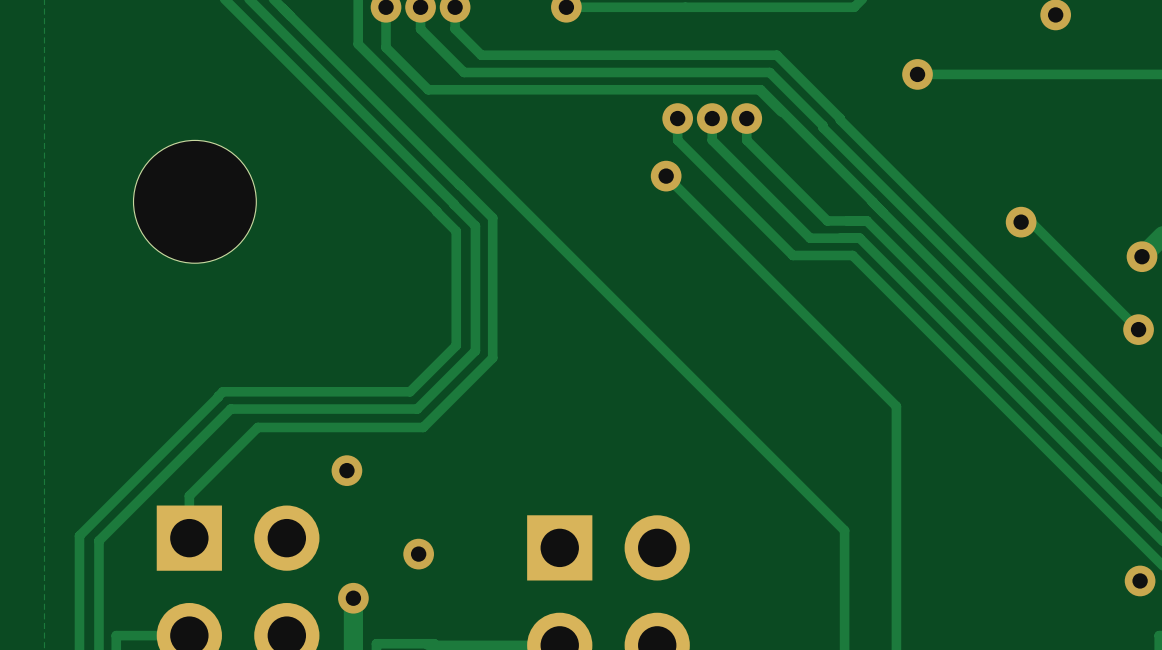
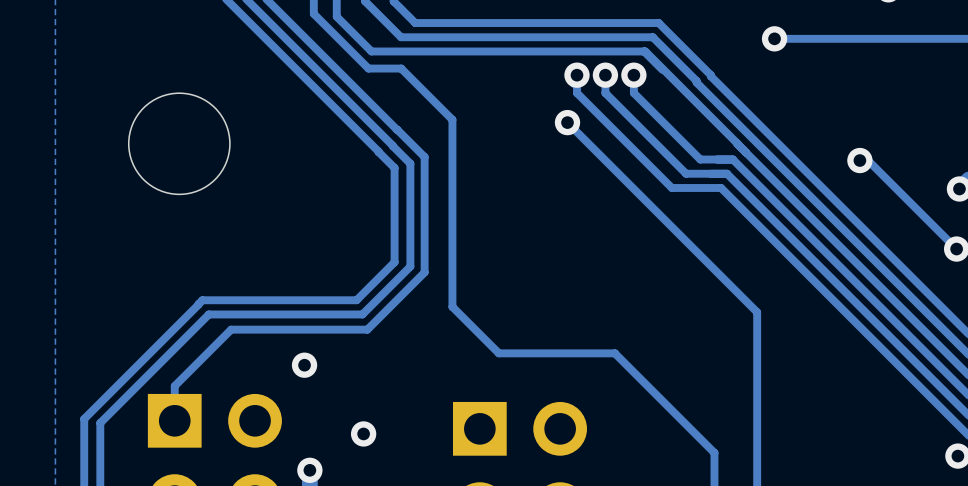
track: (424, 110) (844, 530) (844, 577) -> (368, 68) (401, 68) (452, 119) (452, 306) (498, 353) (614, 353) (714, 452)

